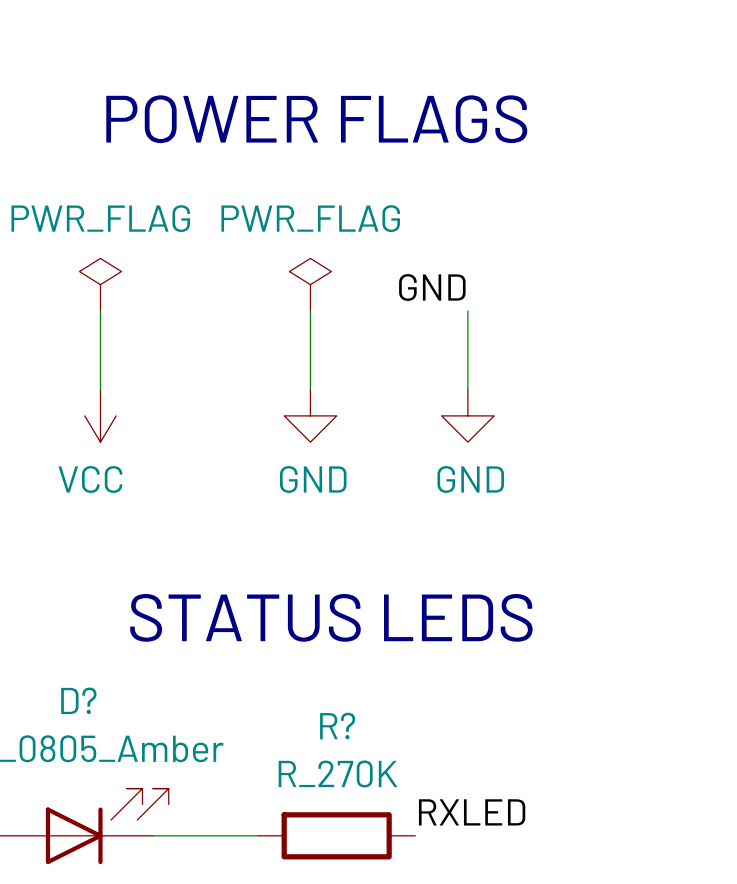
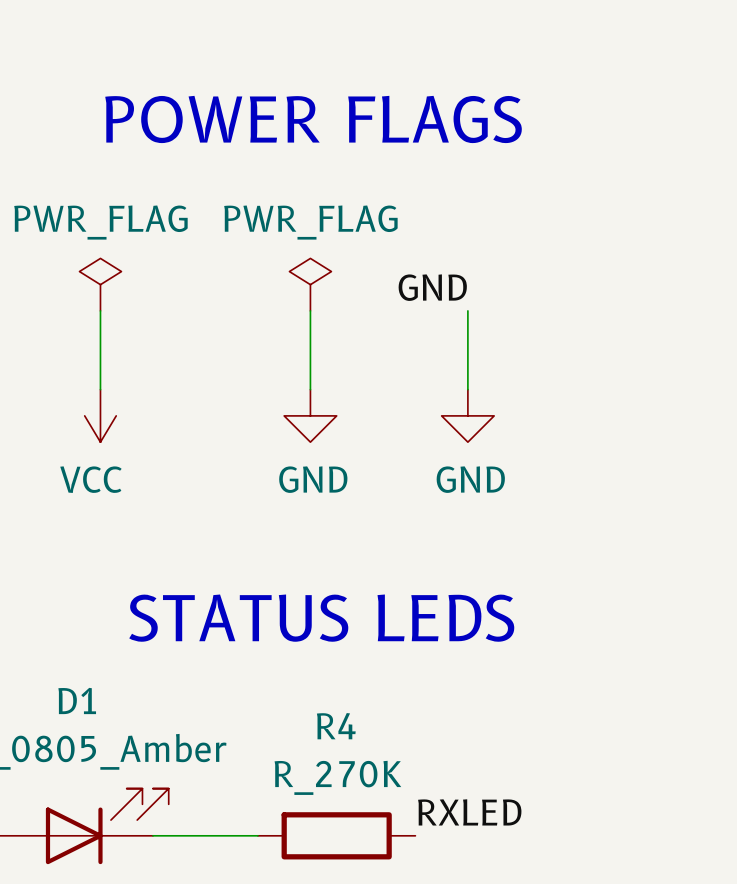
D? name: D? (78, 700) -> D1 (77, 700)
R? name: R? (337, 726) -> R4 (336, 726)

